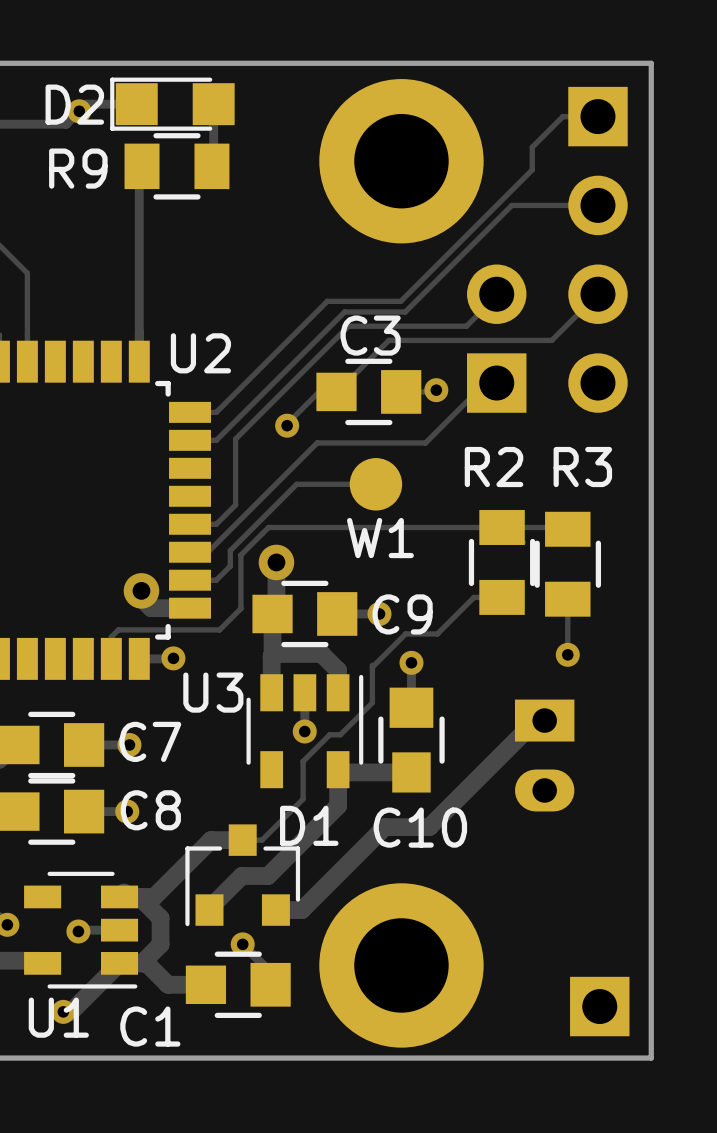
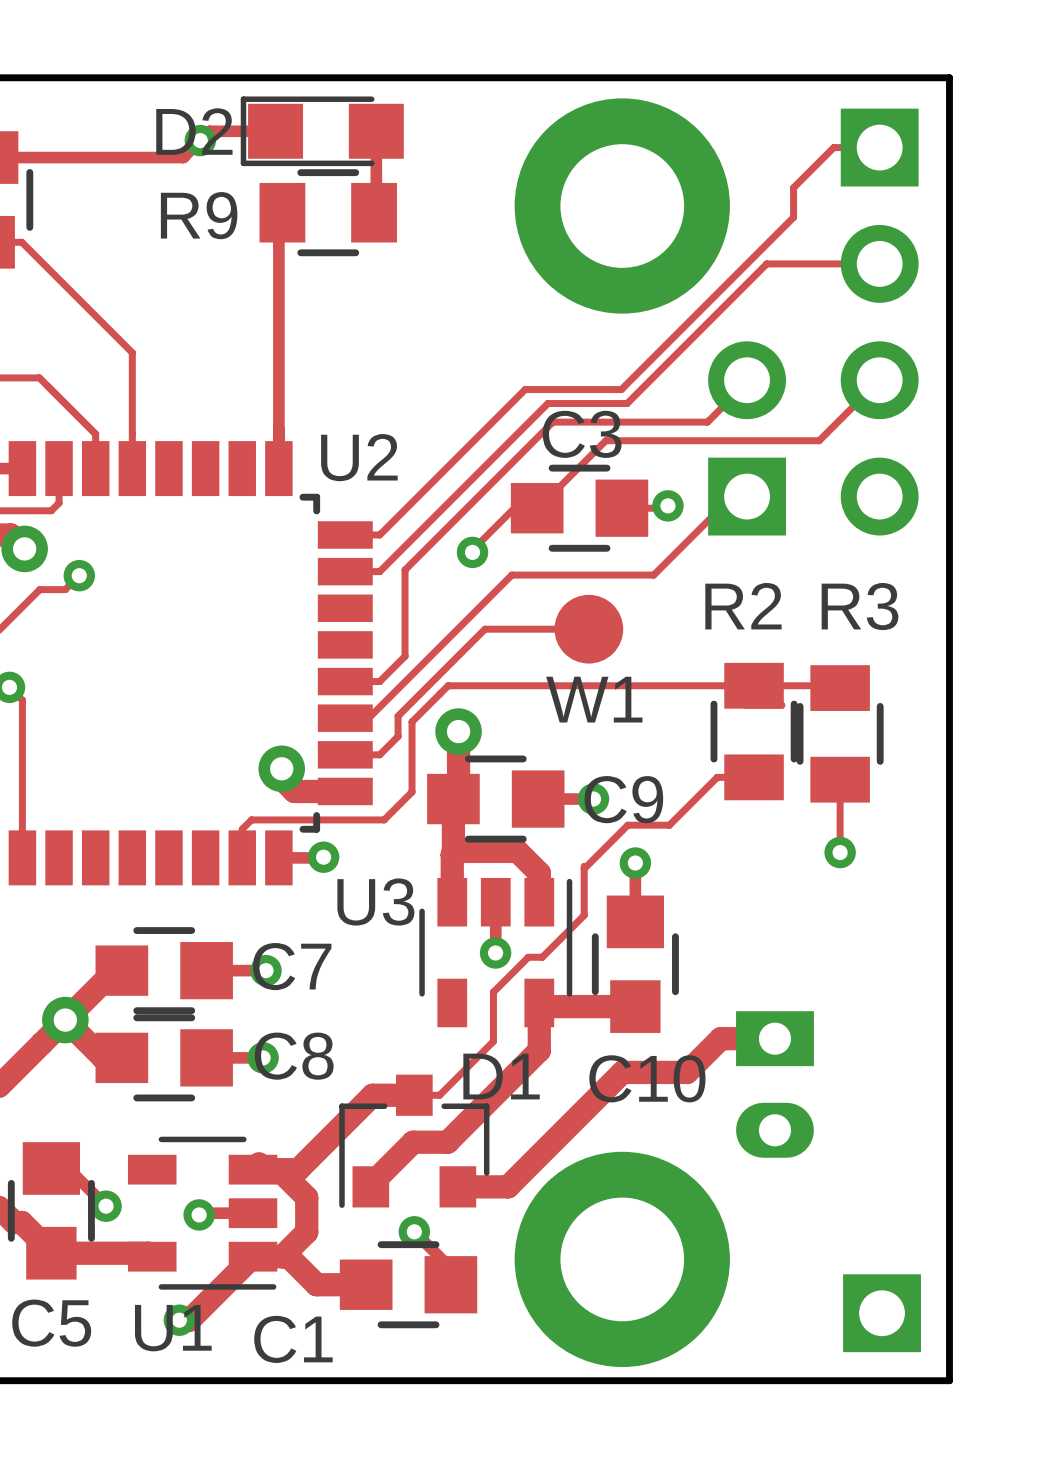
track: (544, 720) (535, 720) (429, 827) (384, 827) (301, 910) -> (774, 1038) (720, 1038) (687, 1072) (622, 1072) (508, 1186) (491, 1186)
part position: (544, 755) -> (774, 1084)

